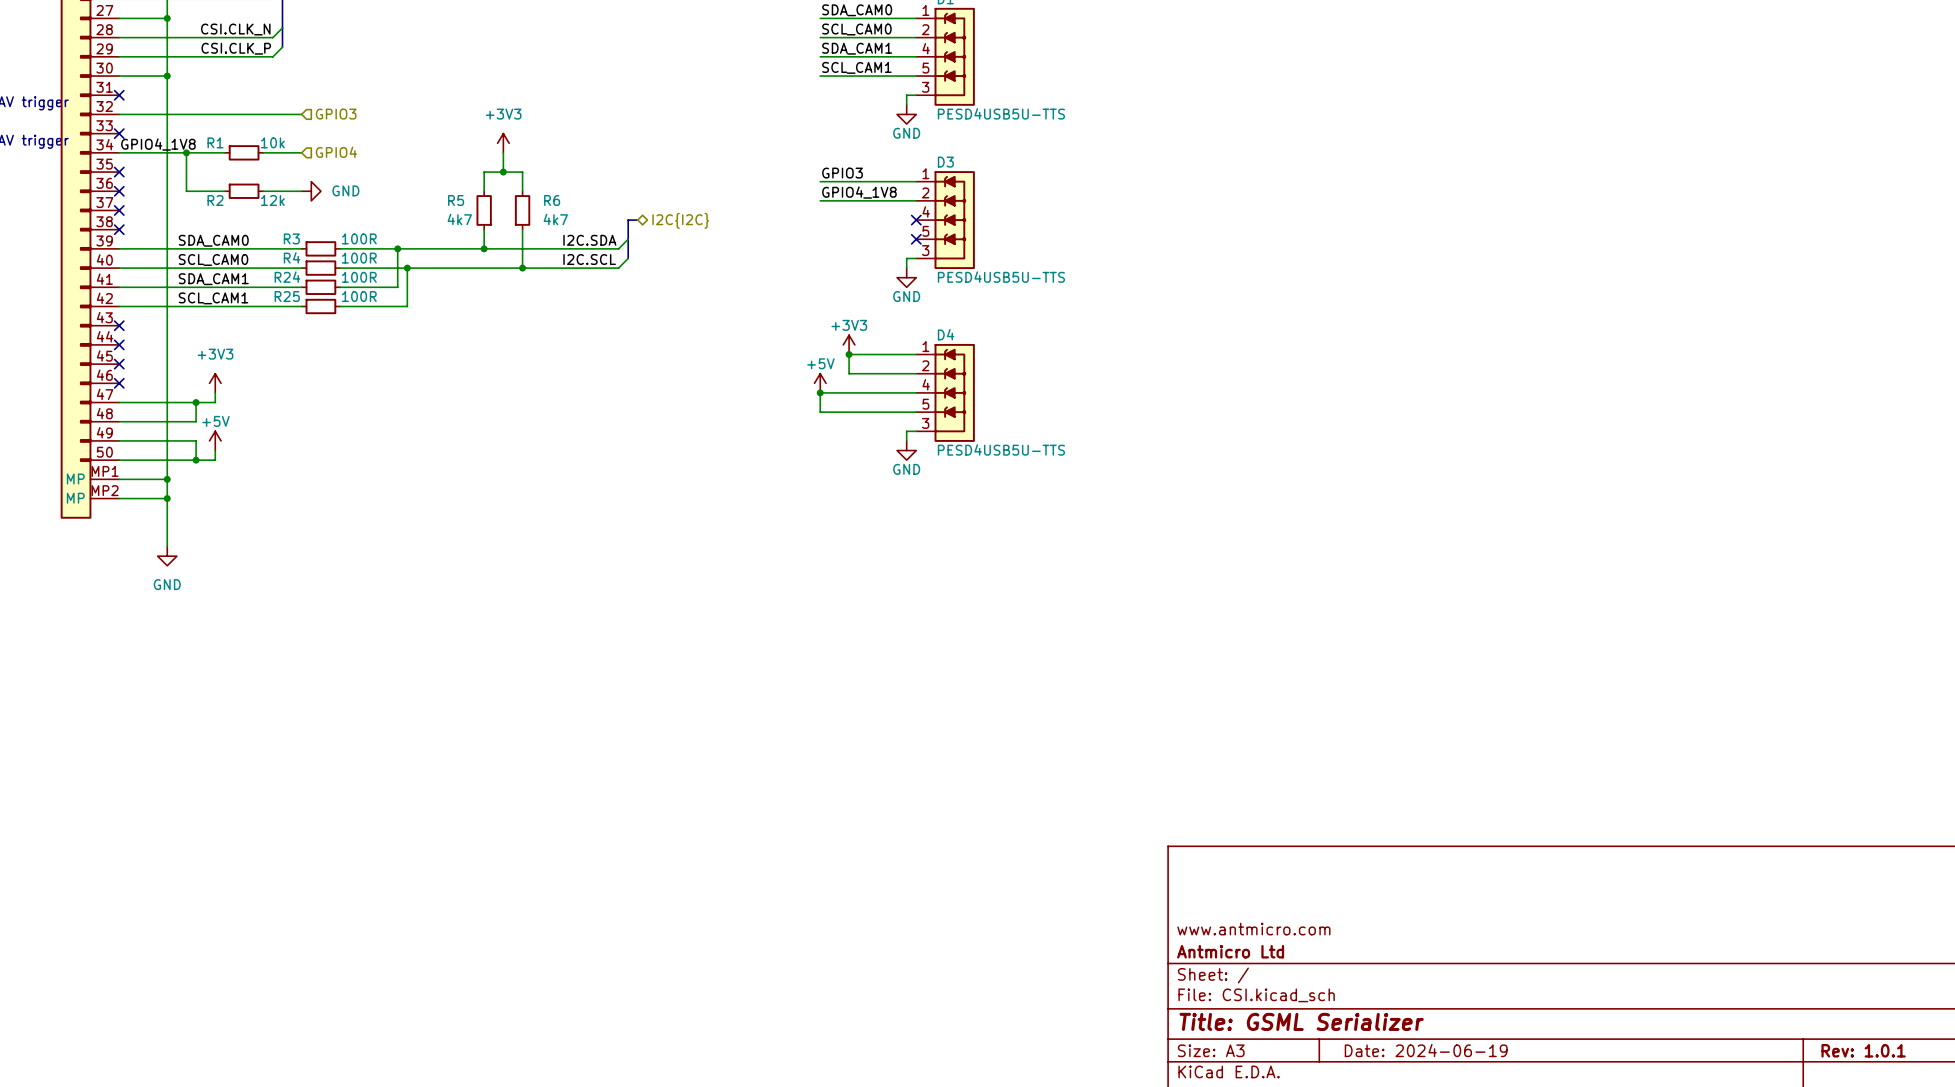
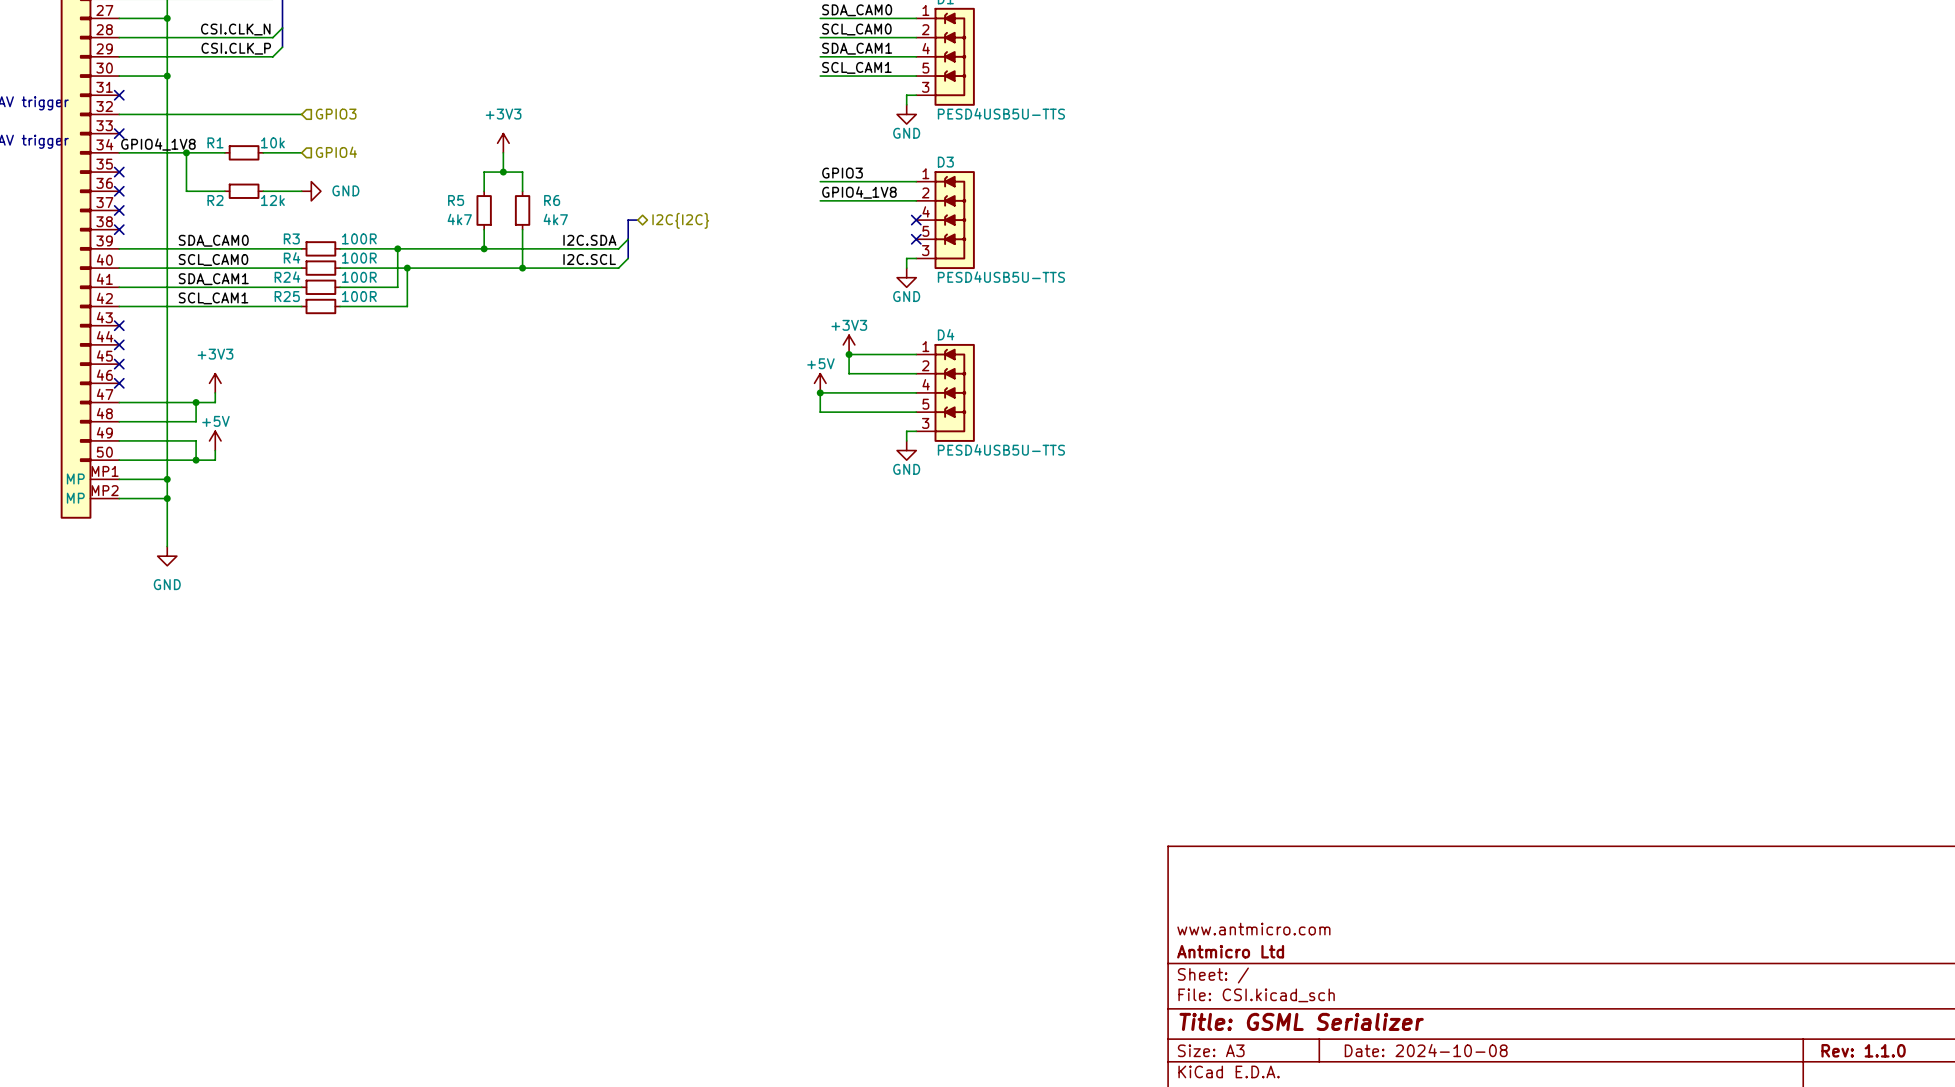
title block: Date: 2024-06-19 (1426, 1050) -> Date: 2024-10-08 (1426, 1050)
title block: Rev: 1.0.1 (1863, 1050) -> Rev: 1.1.0 (1863, 1050)

